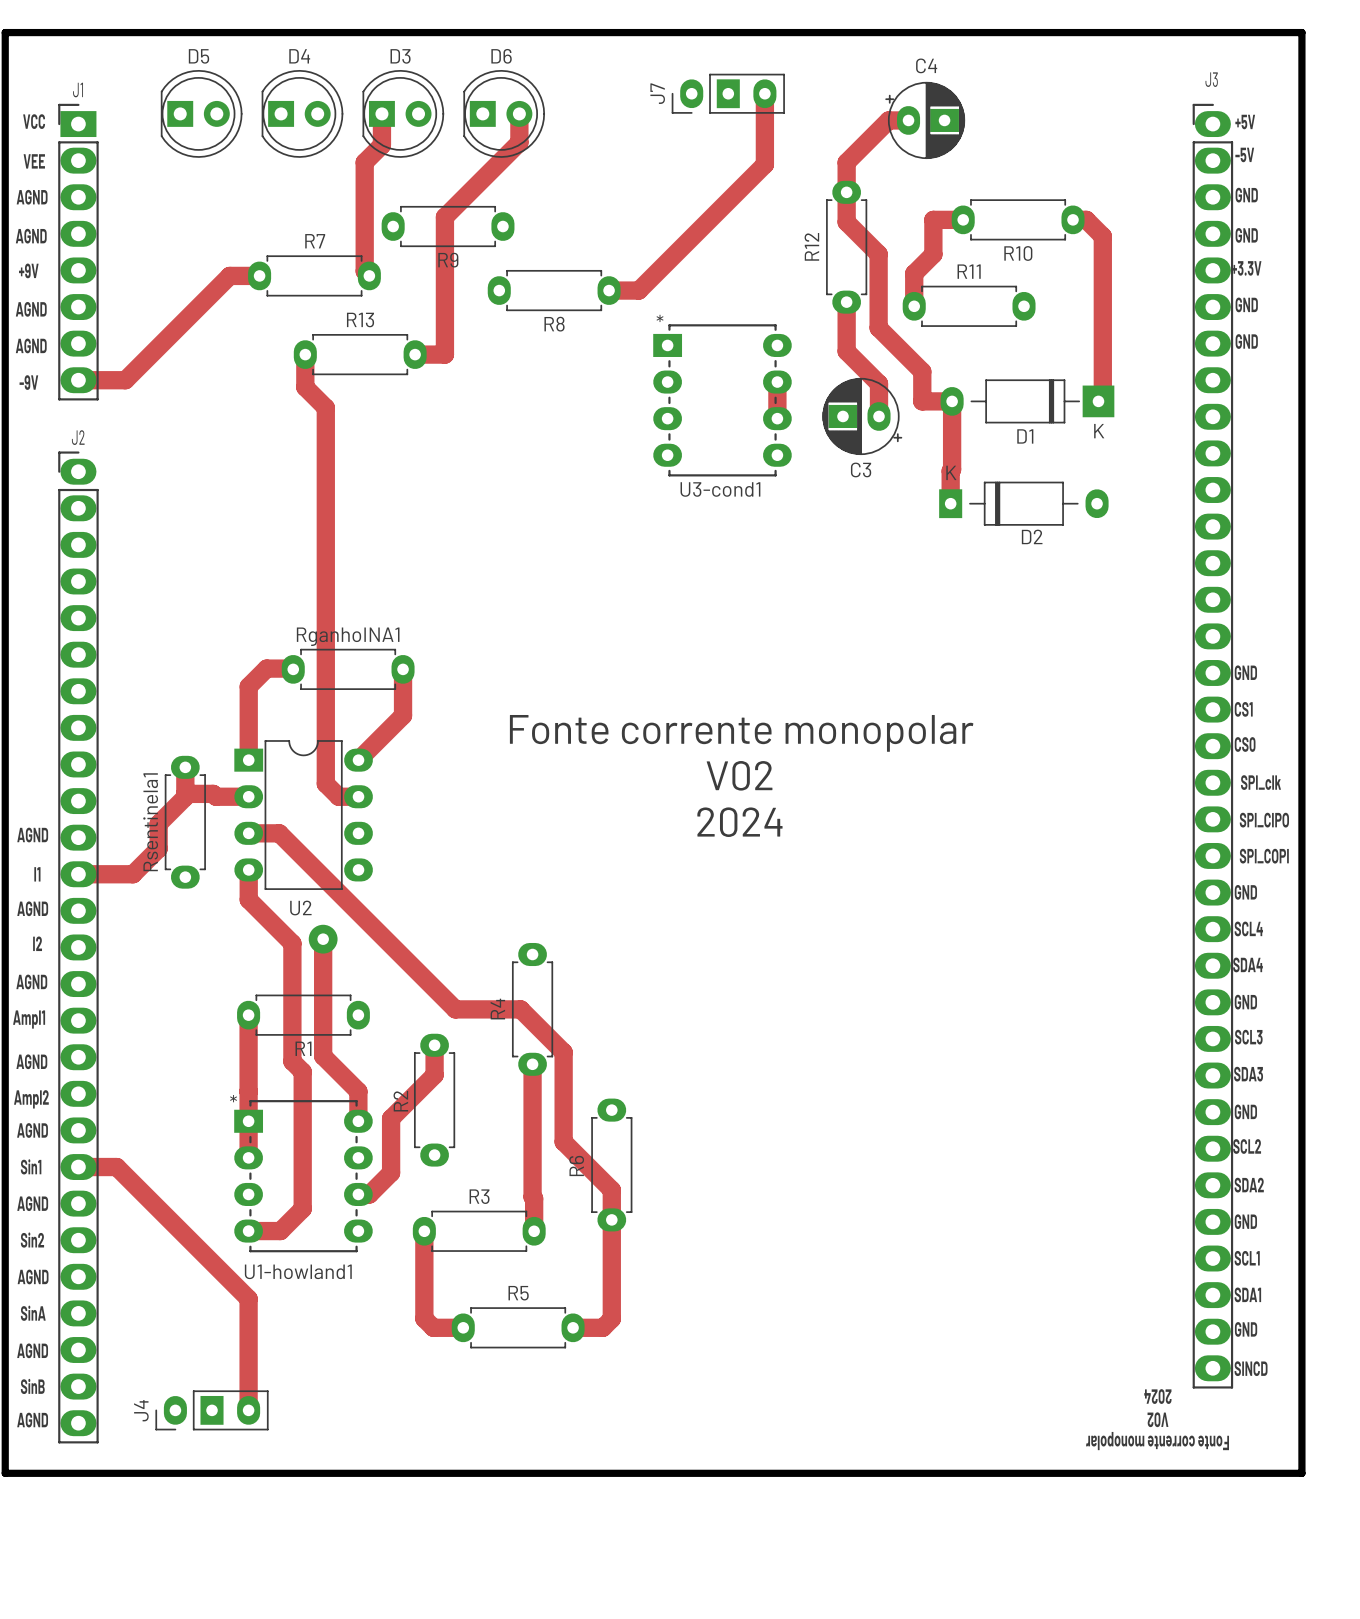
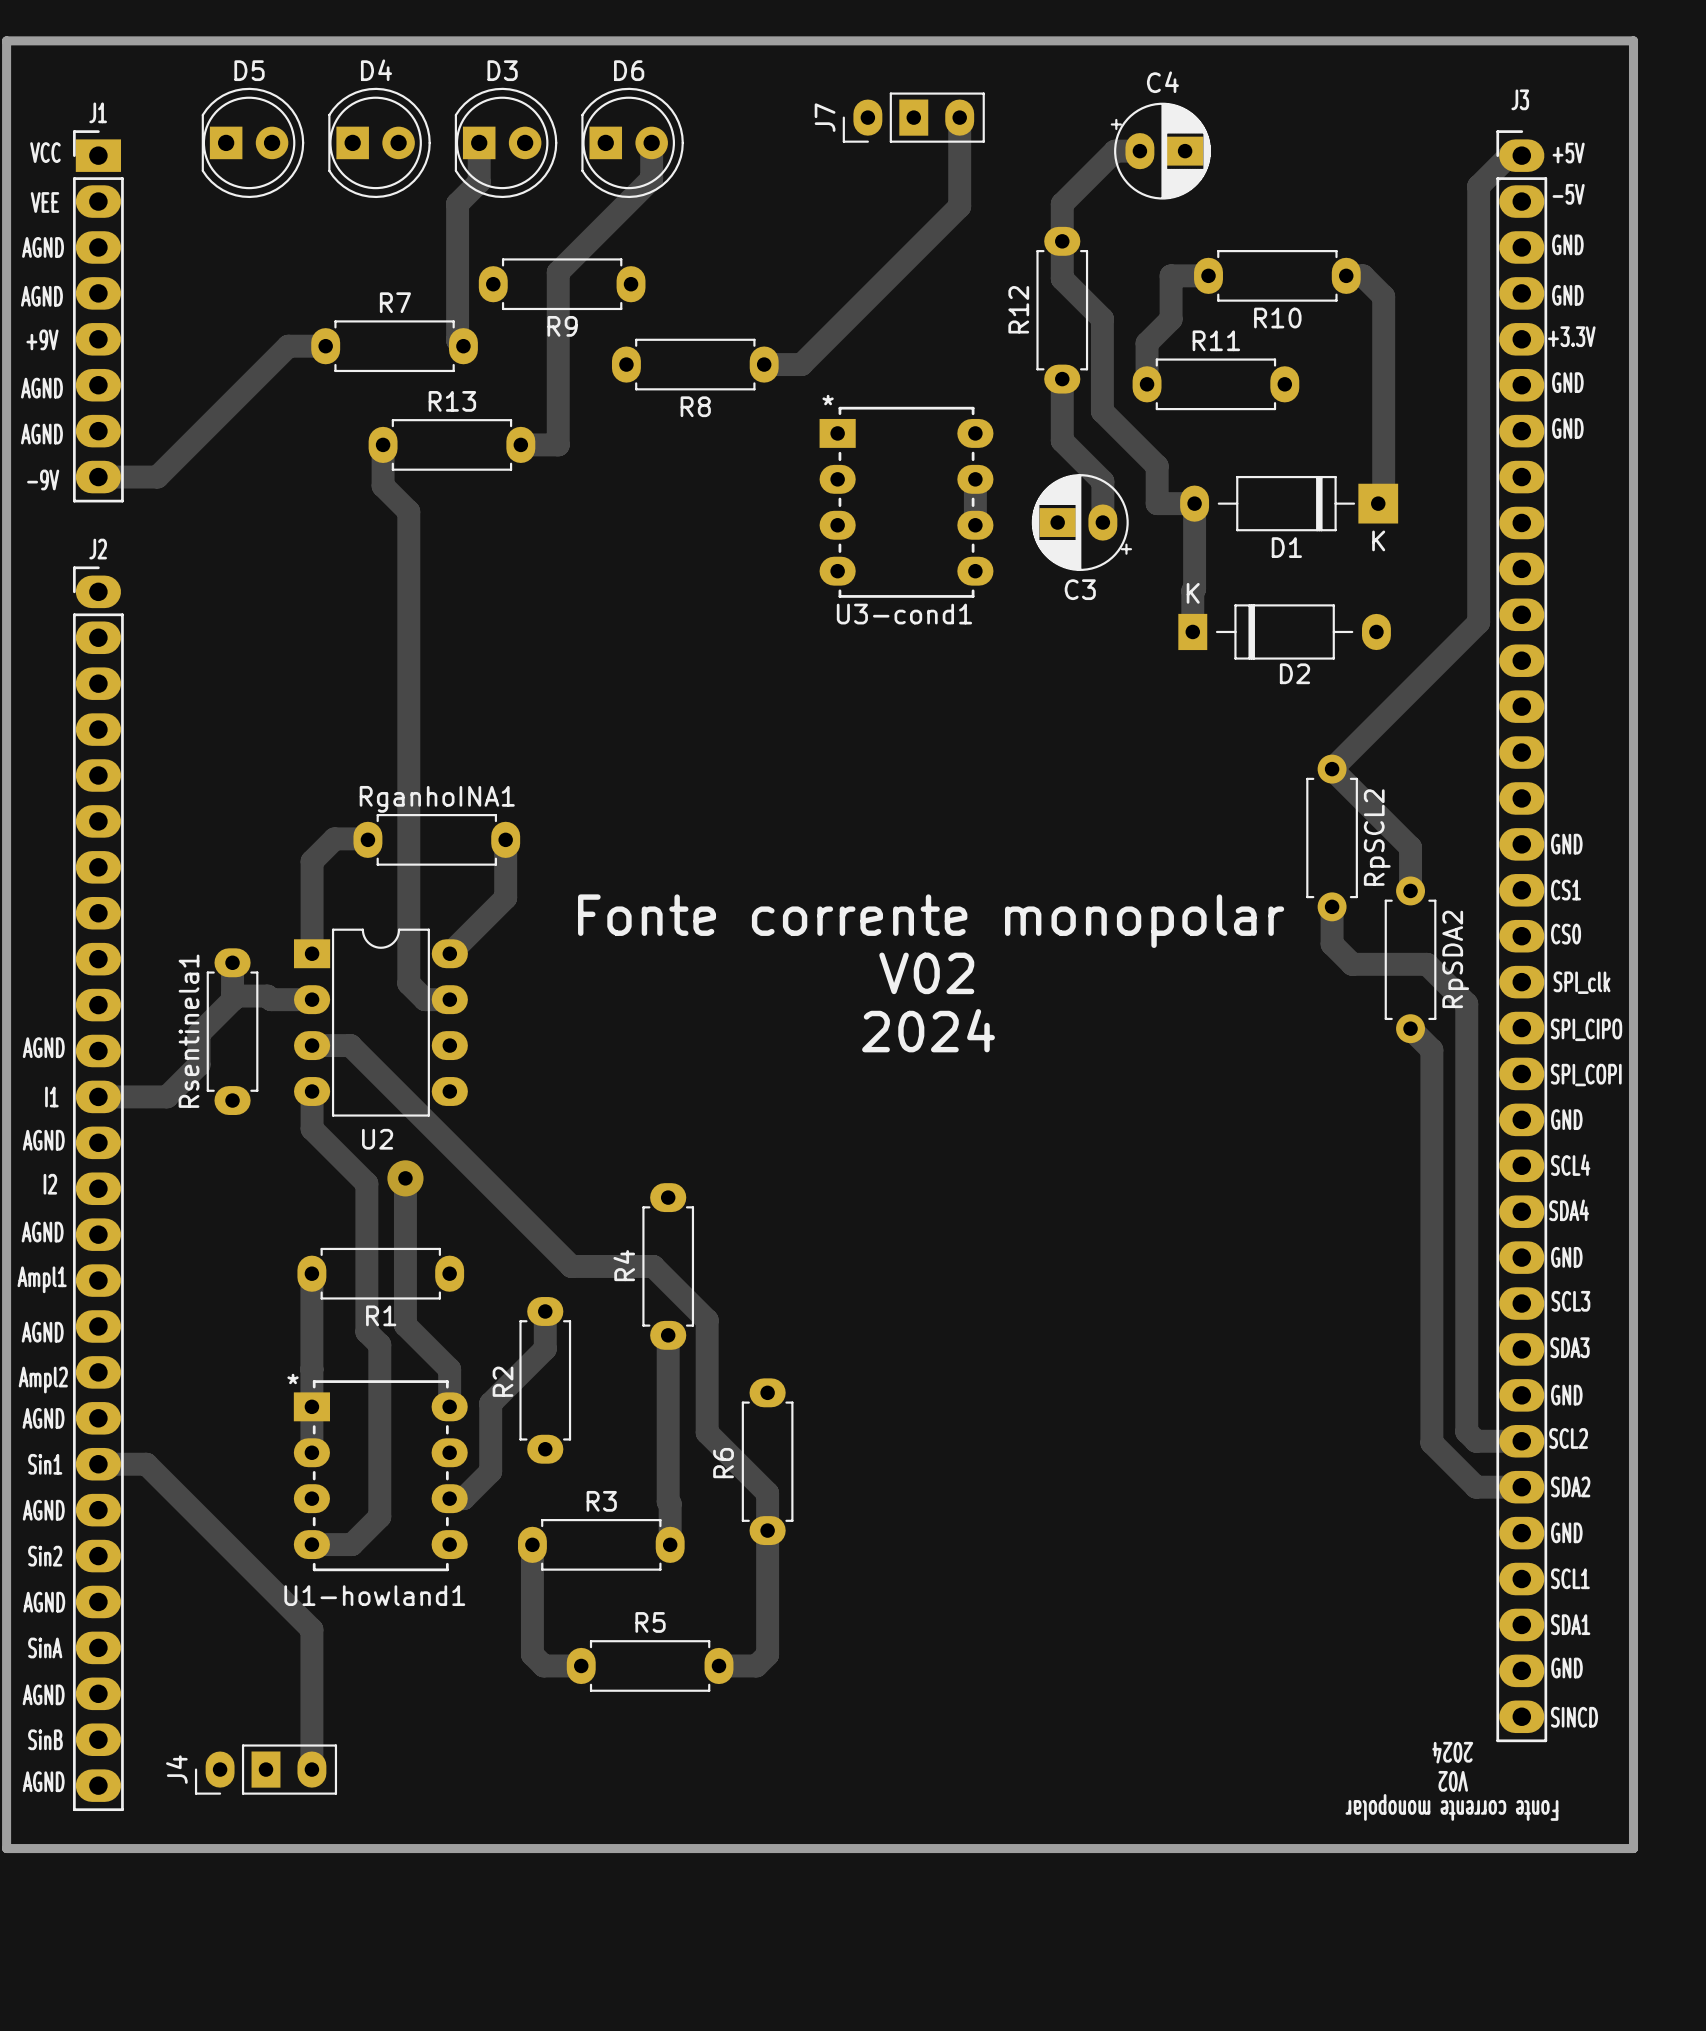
track: none -> (1521, 155) (1509, 155) (1478, 186) (1478, 622) (1332, 769) (1410, 847) (1410, 890)
RpSCL2: none -> (1332, 837)
track: none -> (1332, 906) (1332, 944) (1352, 964) (1427, 964) (1466, 1003) (1466, 1431) (1476, 1441) (1521, 1441)
RpSDA2: none -> (1410, 959)
track: none -> (1410, 1028) (1431, 1050) (1431, 1442) (1476, 1487) (1521, 1487)

